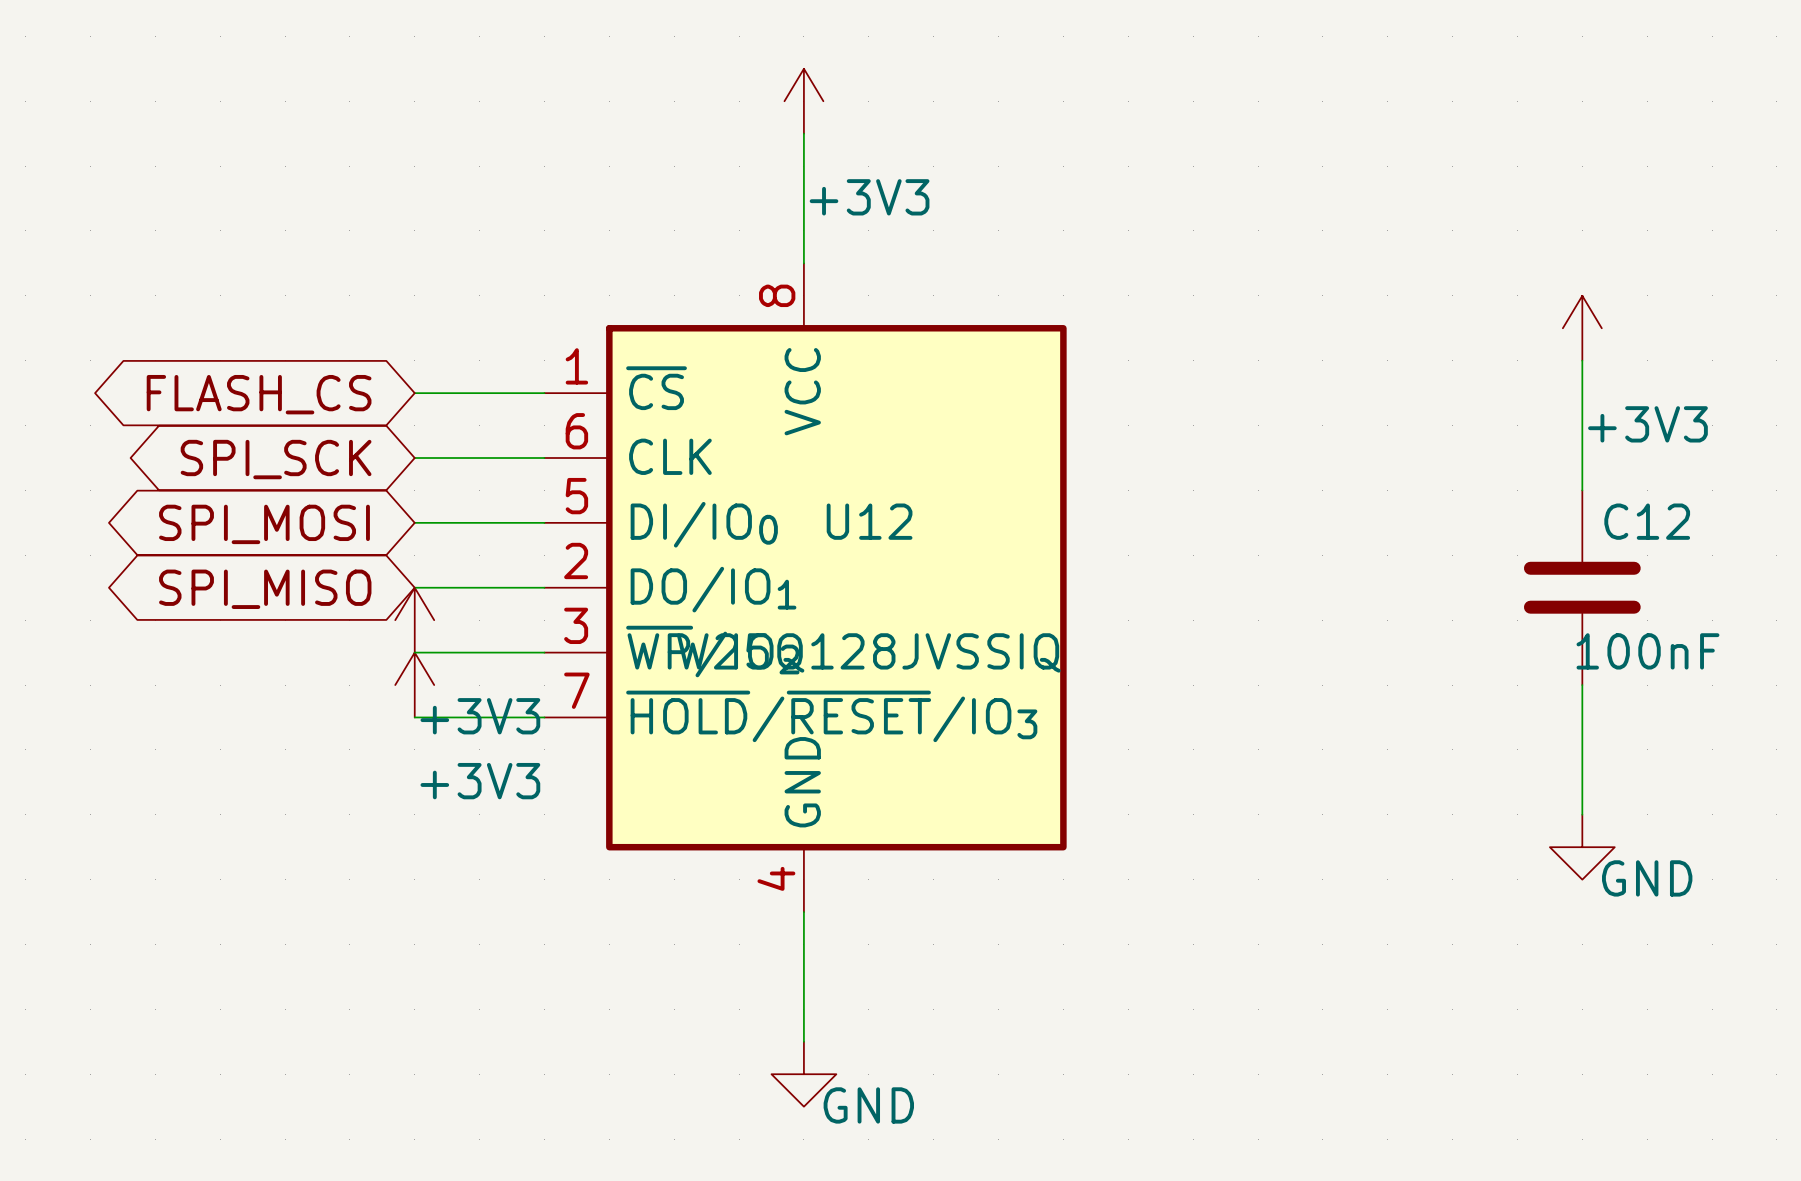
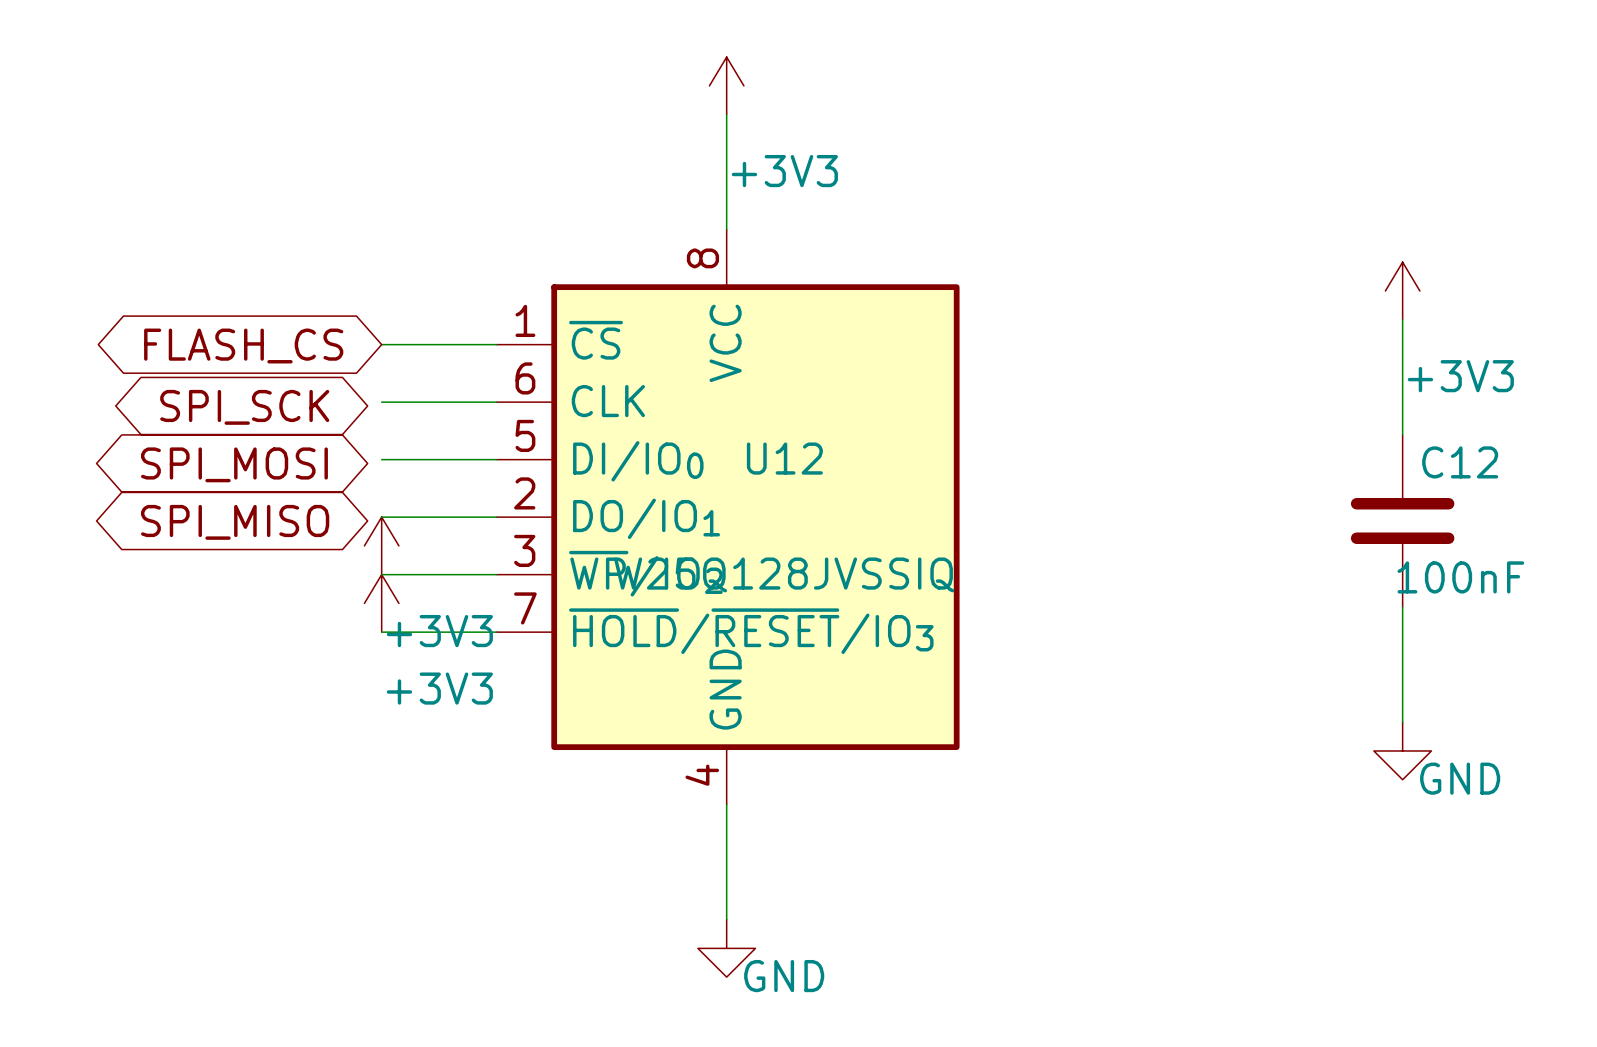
power symbol position: +3V3 (803, 101) -> +3V3 (726, 85)
wire: (803, 133) (803, 263) -> (726, 114) (726, 229)
wire: (414, 393) (544, 393) -> (381, 344) (496, 344)
global label position: FLASH_CS (259, 394) -> FLASH_CS (243, 346)
wire: (414, 458) (544, 458) -> (381, 402) (496, 402)
wire: (414, 522) (544, 522) -> (381, 459) (496, 459)
wire: (414, 587) (544, 587) -> (381, 517) (496, 517)
U12 position: (805, 587) -> (728, 517)
power symbol position: +3V3 (414, 620) -> +3V3 (381, 545)
wire: (414, 652) (544, 652) -> (381, 574) (496, 574)
power symbol position: +3V3 (414, 685) -> +3V3 (381, 603)
wire: (414, 717) (544, 717) -> (381, 632) (496, 632)
wire: (803, 912) (803, 1041) -> (726, 804) (726, 919)
power symbol position: GND (803, 1074) -> GND (726, 948)

